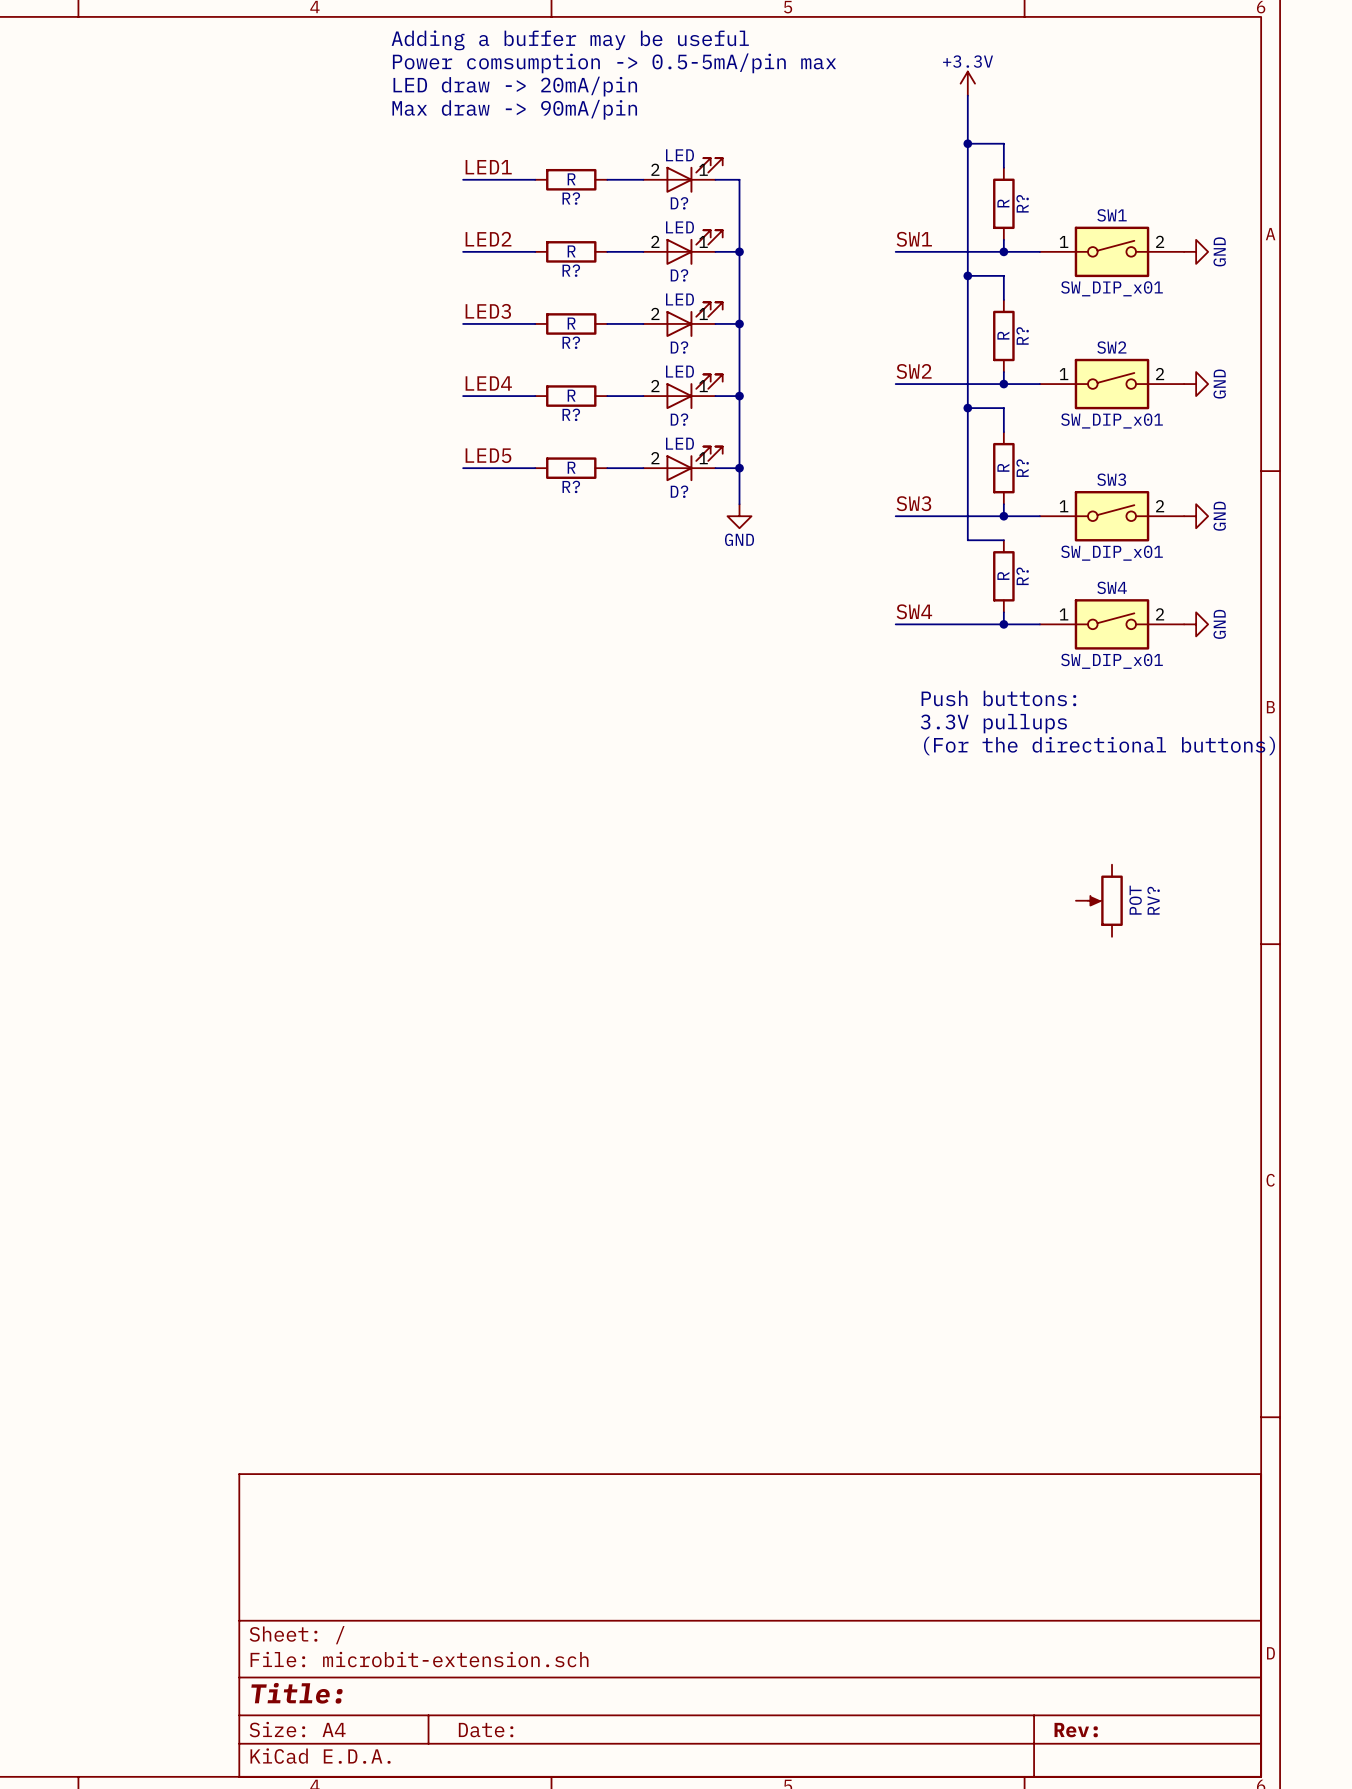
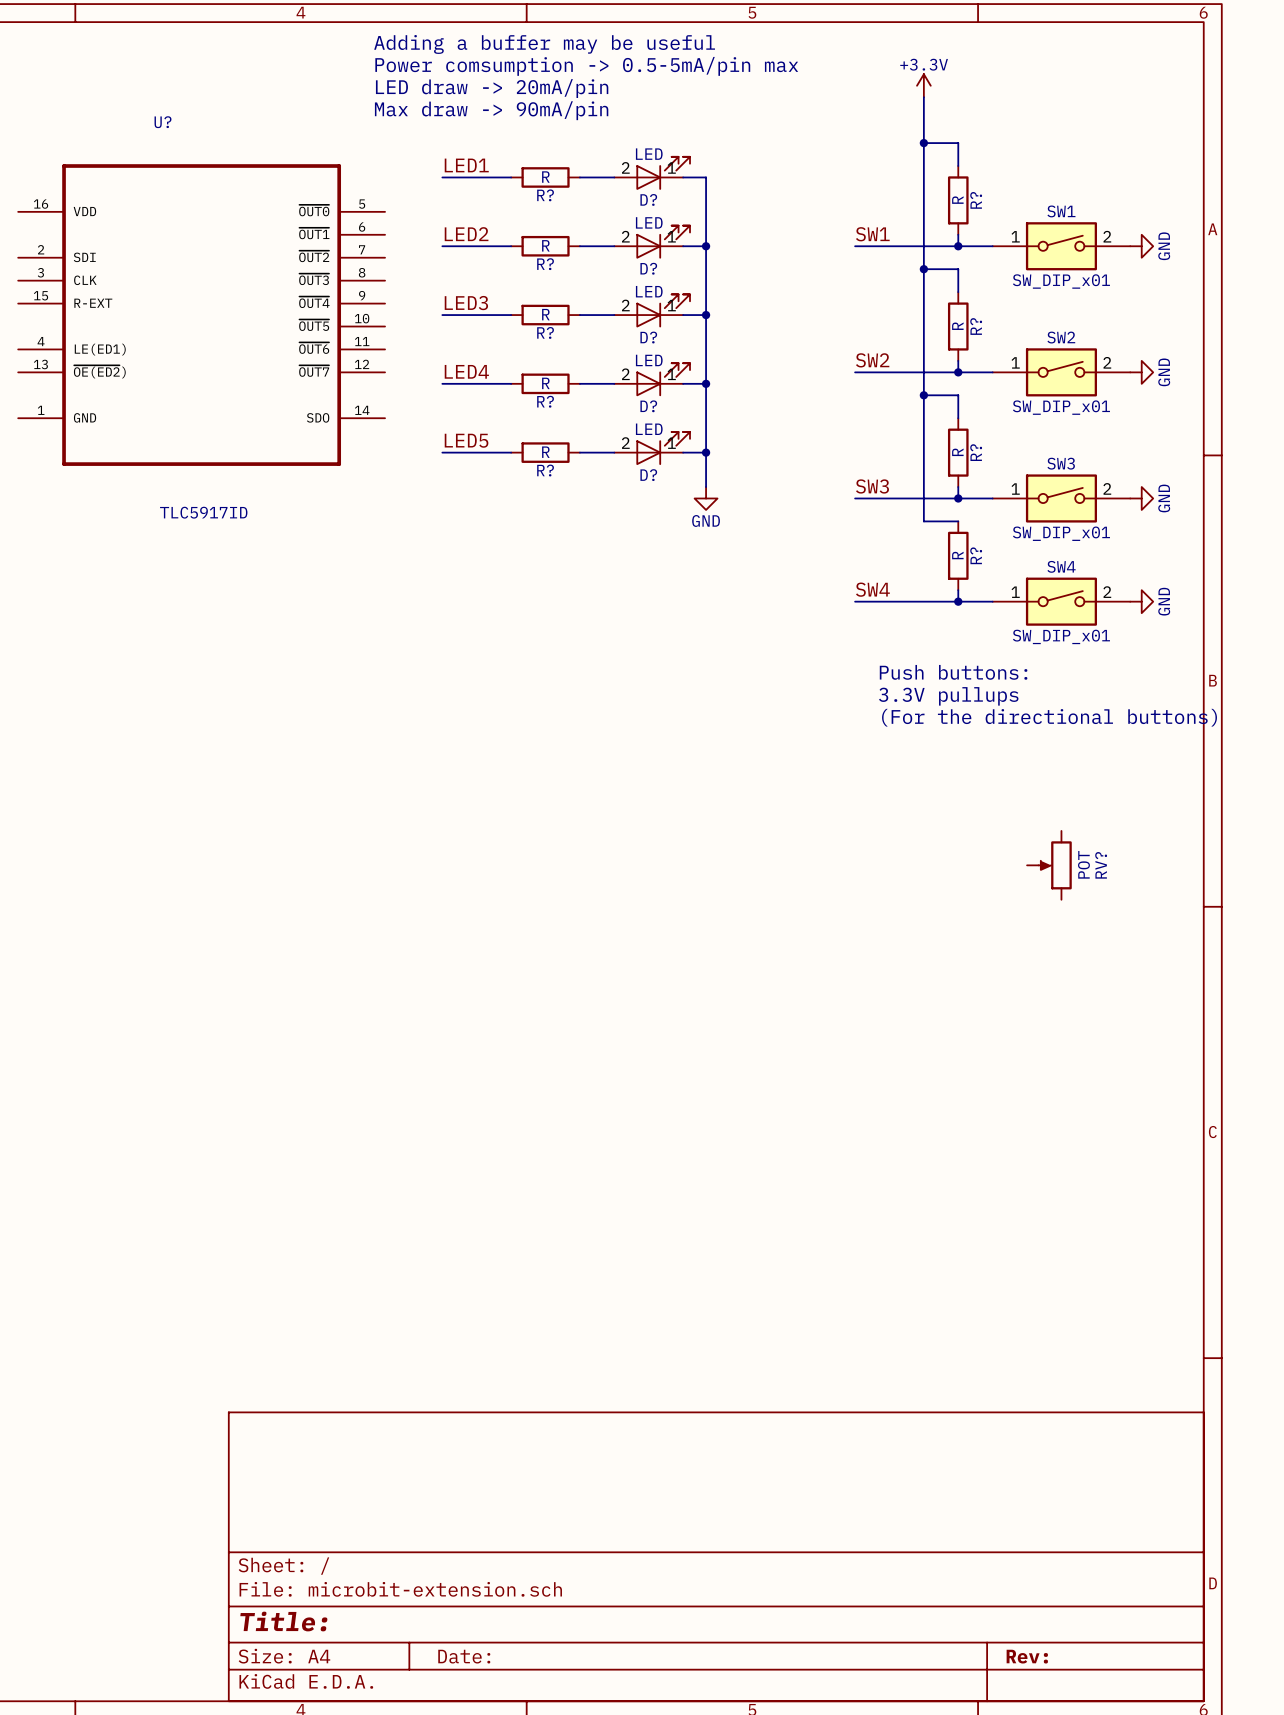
U?: none -> TLC5917ID (201, 315)

